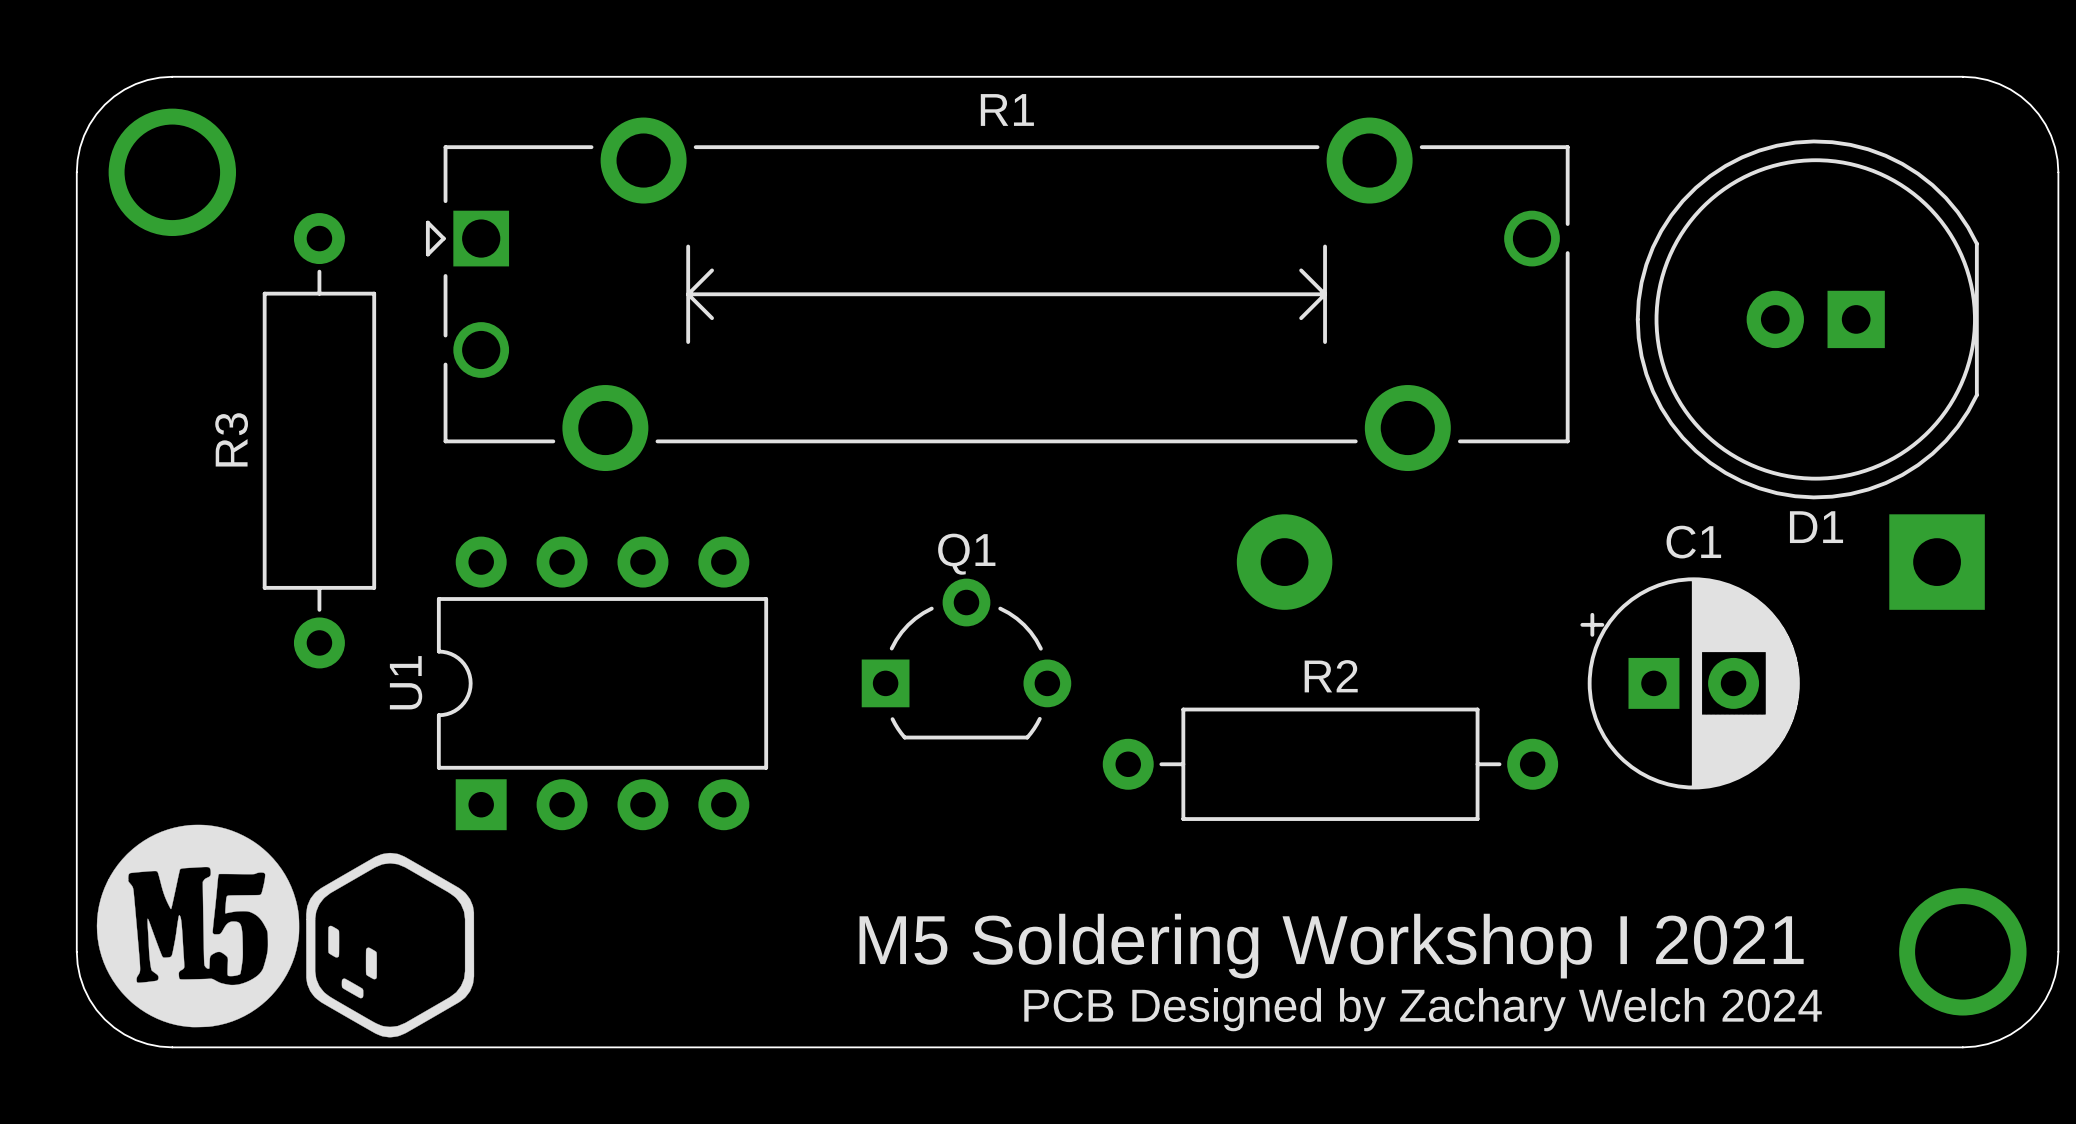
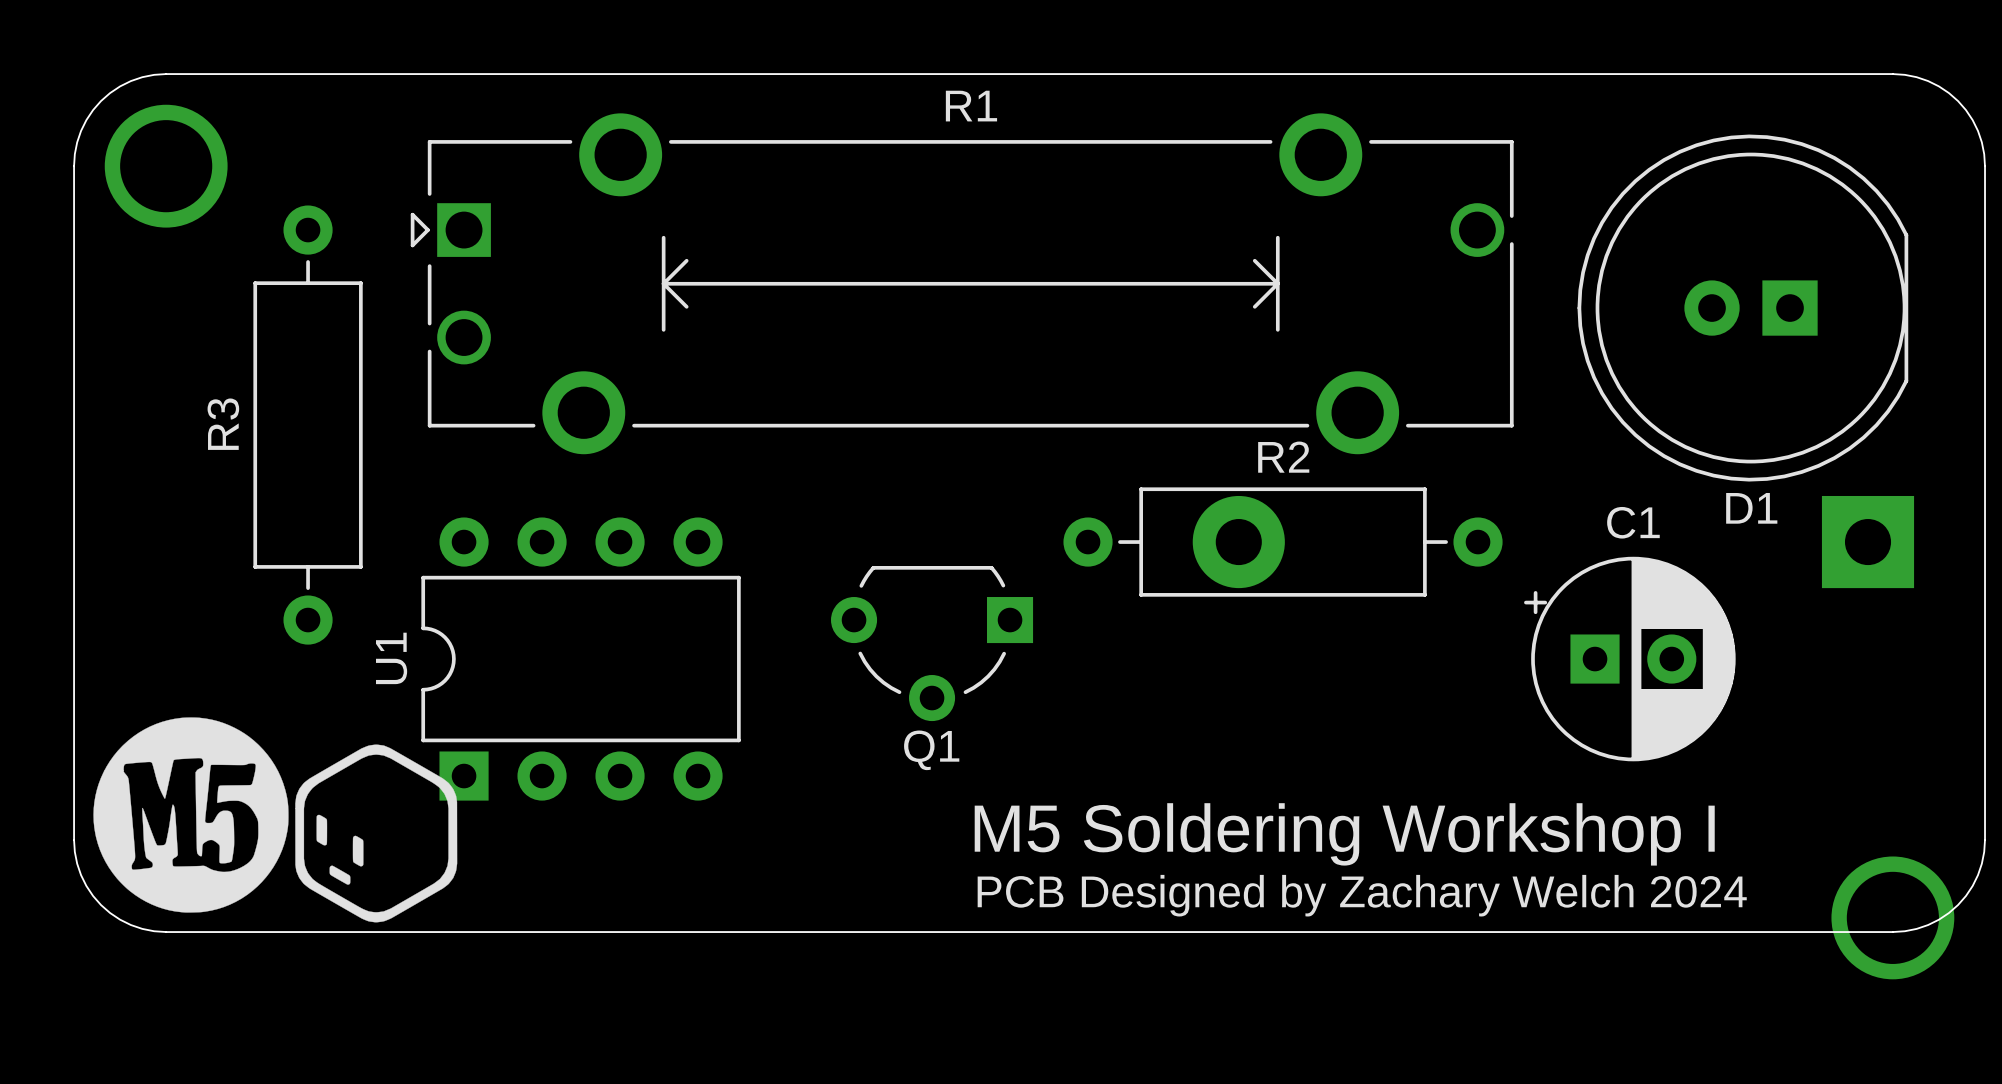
Q1 rotation: 0° (966, 659) -> 180° (932, 643)
R2 position: (1330, 764) -> (1283, 542)
board edge: (76, 870) (77, 964) (80, 976) (89, 999) (104, 1019) (124, 1034) (147, 1044) (172, 1047) (1975, 1046) (1999, 1040) (2021, 1027) (2038, 1009) (2051, 988) (2057, 964) (2058, 951) (2058, 870) -> (74, 839) (77, 863) (81, 875) (86, 885) (101, 905) (120, 919) (130, 925) (154, 931) (166, 932) (1892, 932) (1916, 928) (1928, 925) (1938, 919) (1958, 905) (1972, 885) (1977, 875) (1984, 851) (1985, 839)
drawing position: (198, 926) -> (190, 815)
drawing position: (390, 945) -> (376, 833)
text: M5 Soldering Workshop I 2021 (1331, 946) -> M5 Soldering Workshop I (1344, 834)
text position: PCB Designed by Zachary Welch 2024 (1423, 1009) -> PCB Designed by Zachary Welch 2024 (1362, 895)

